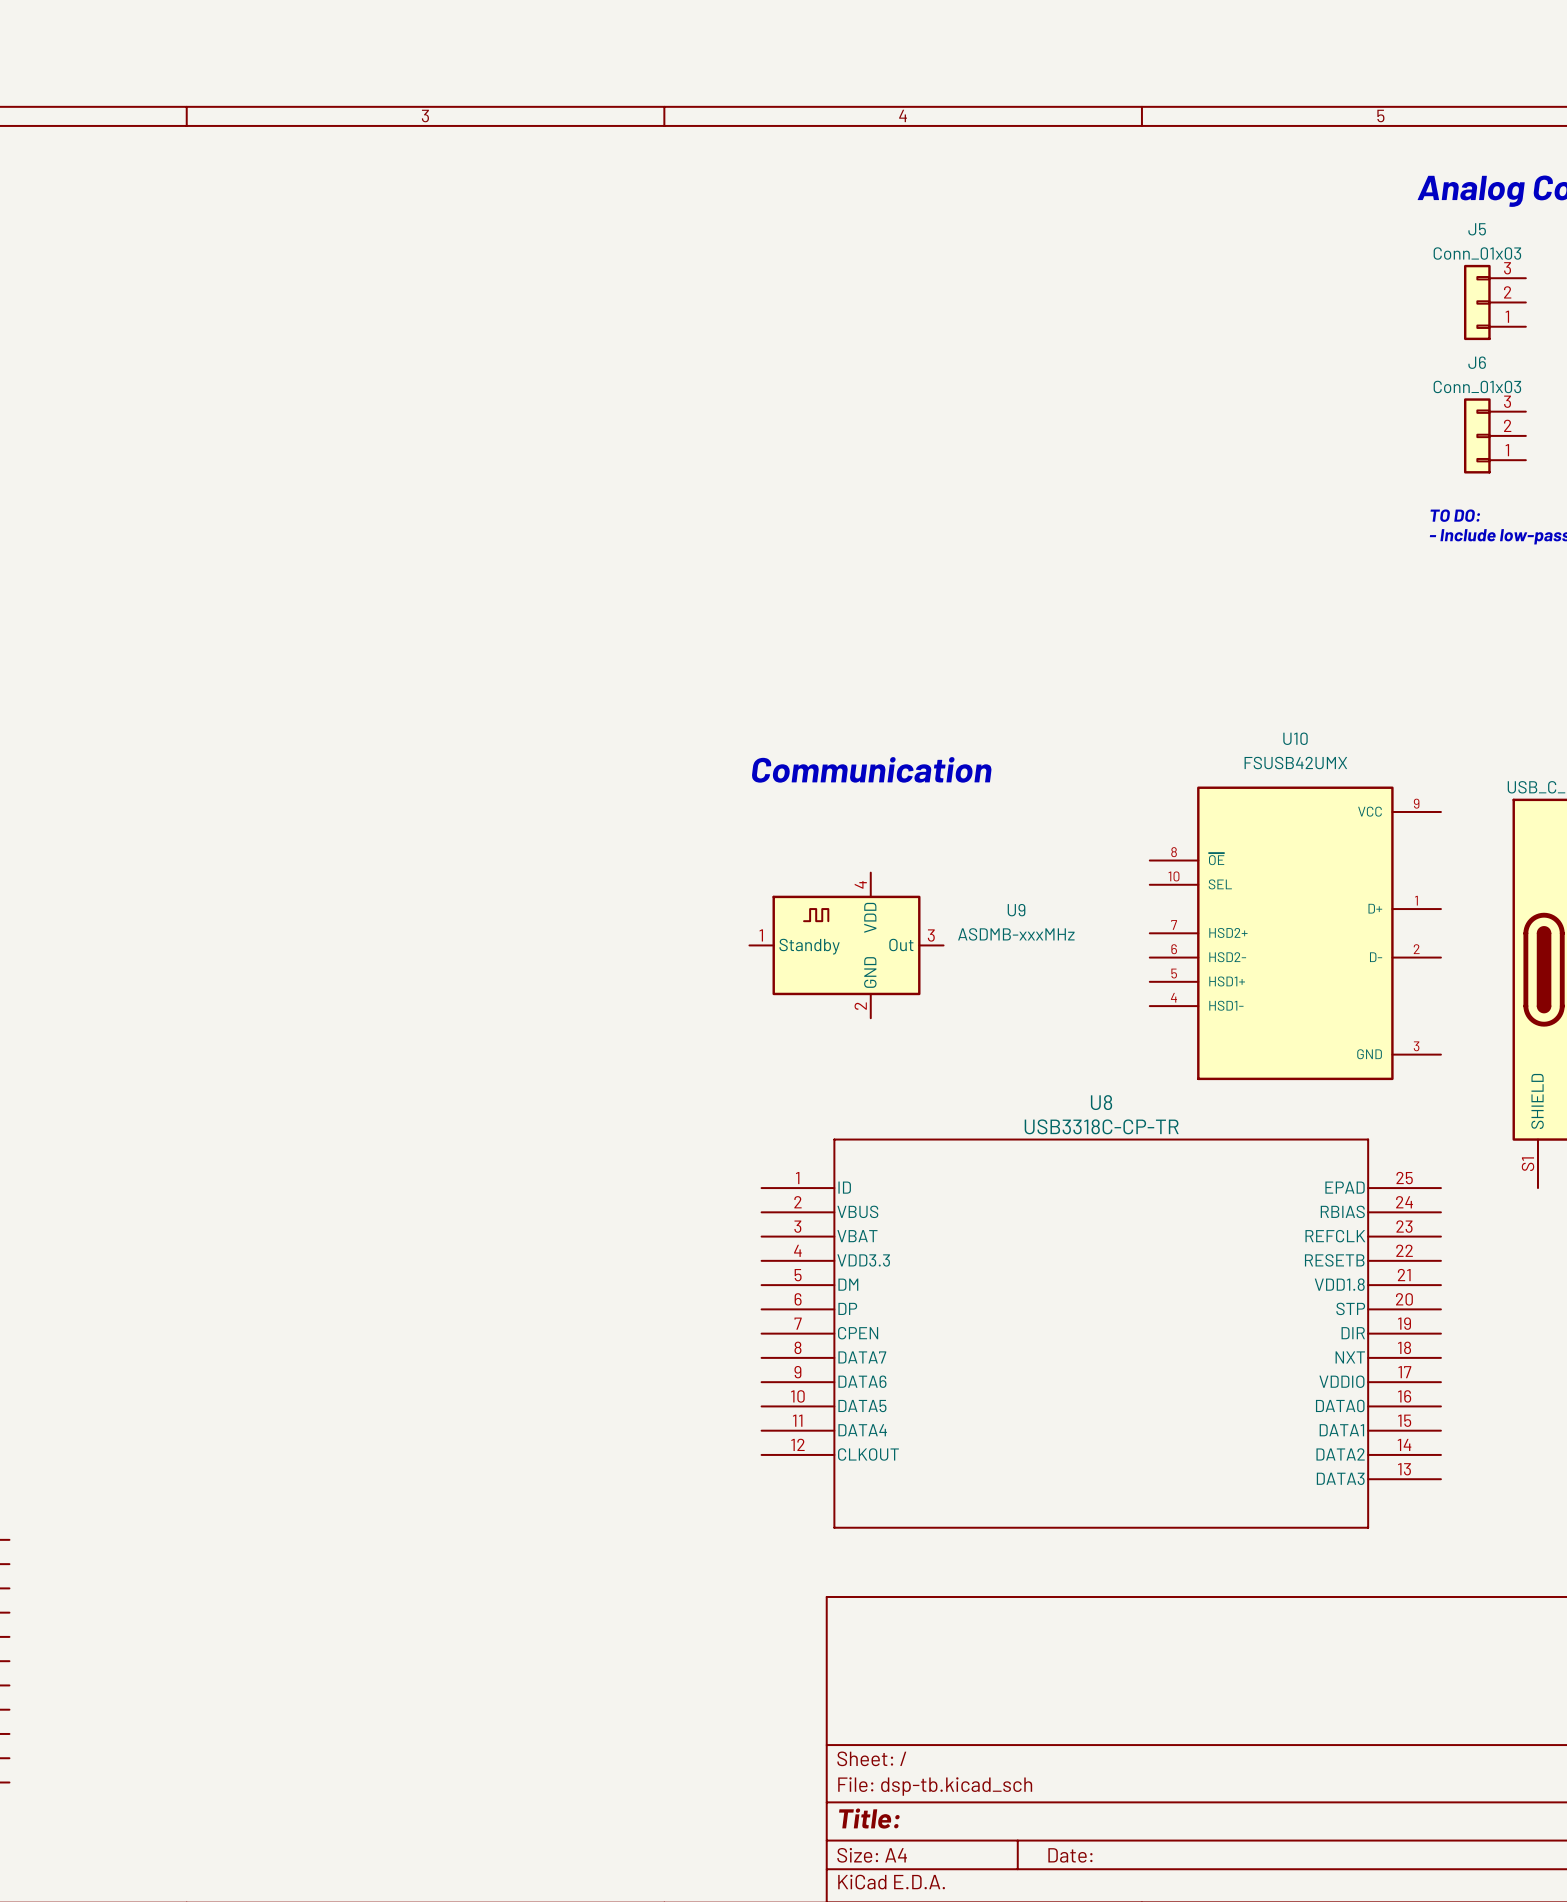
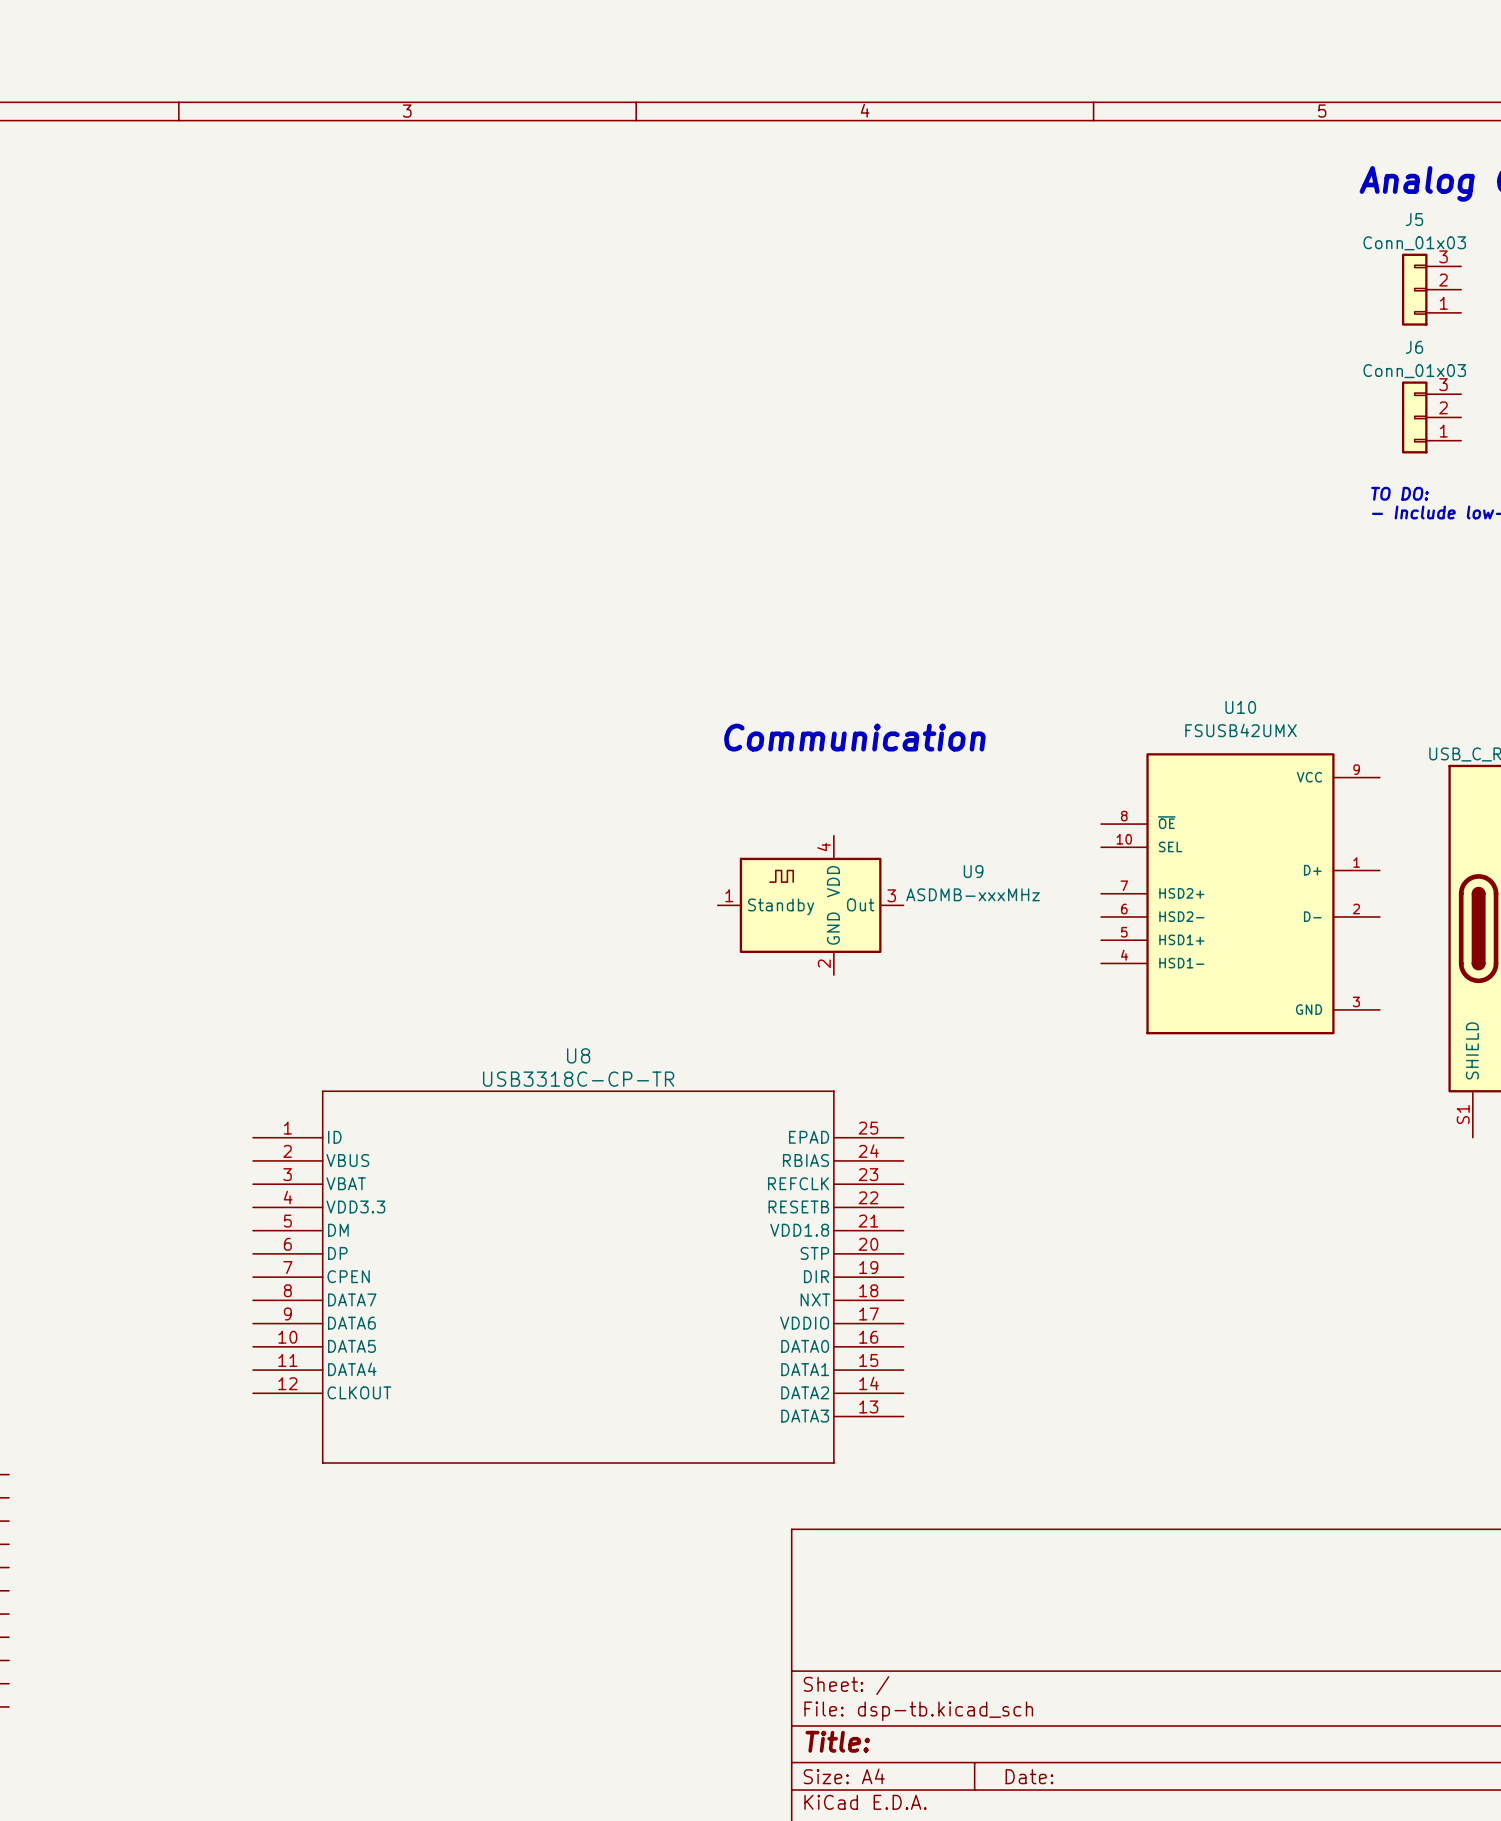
U8 position: (1101, 1333) -> (578, 1277)

